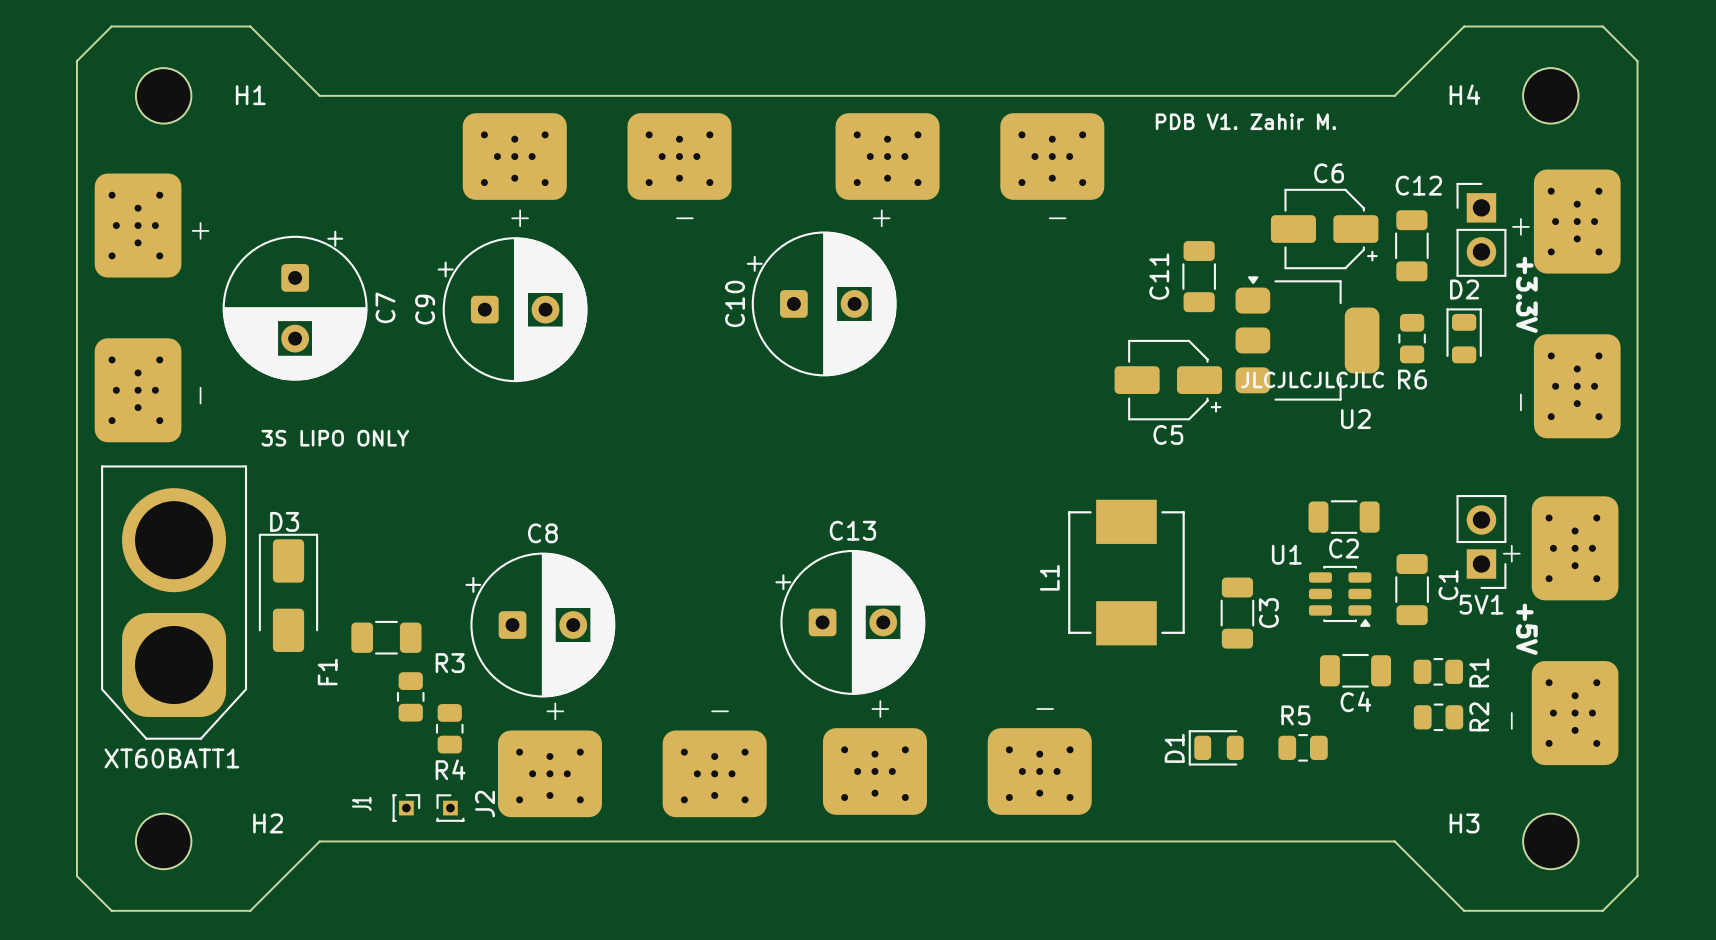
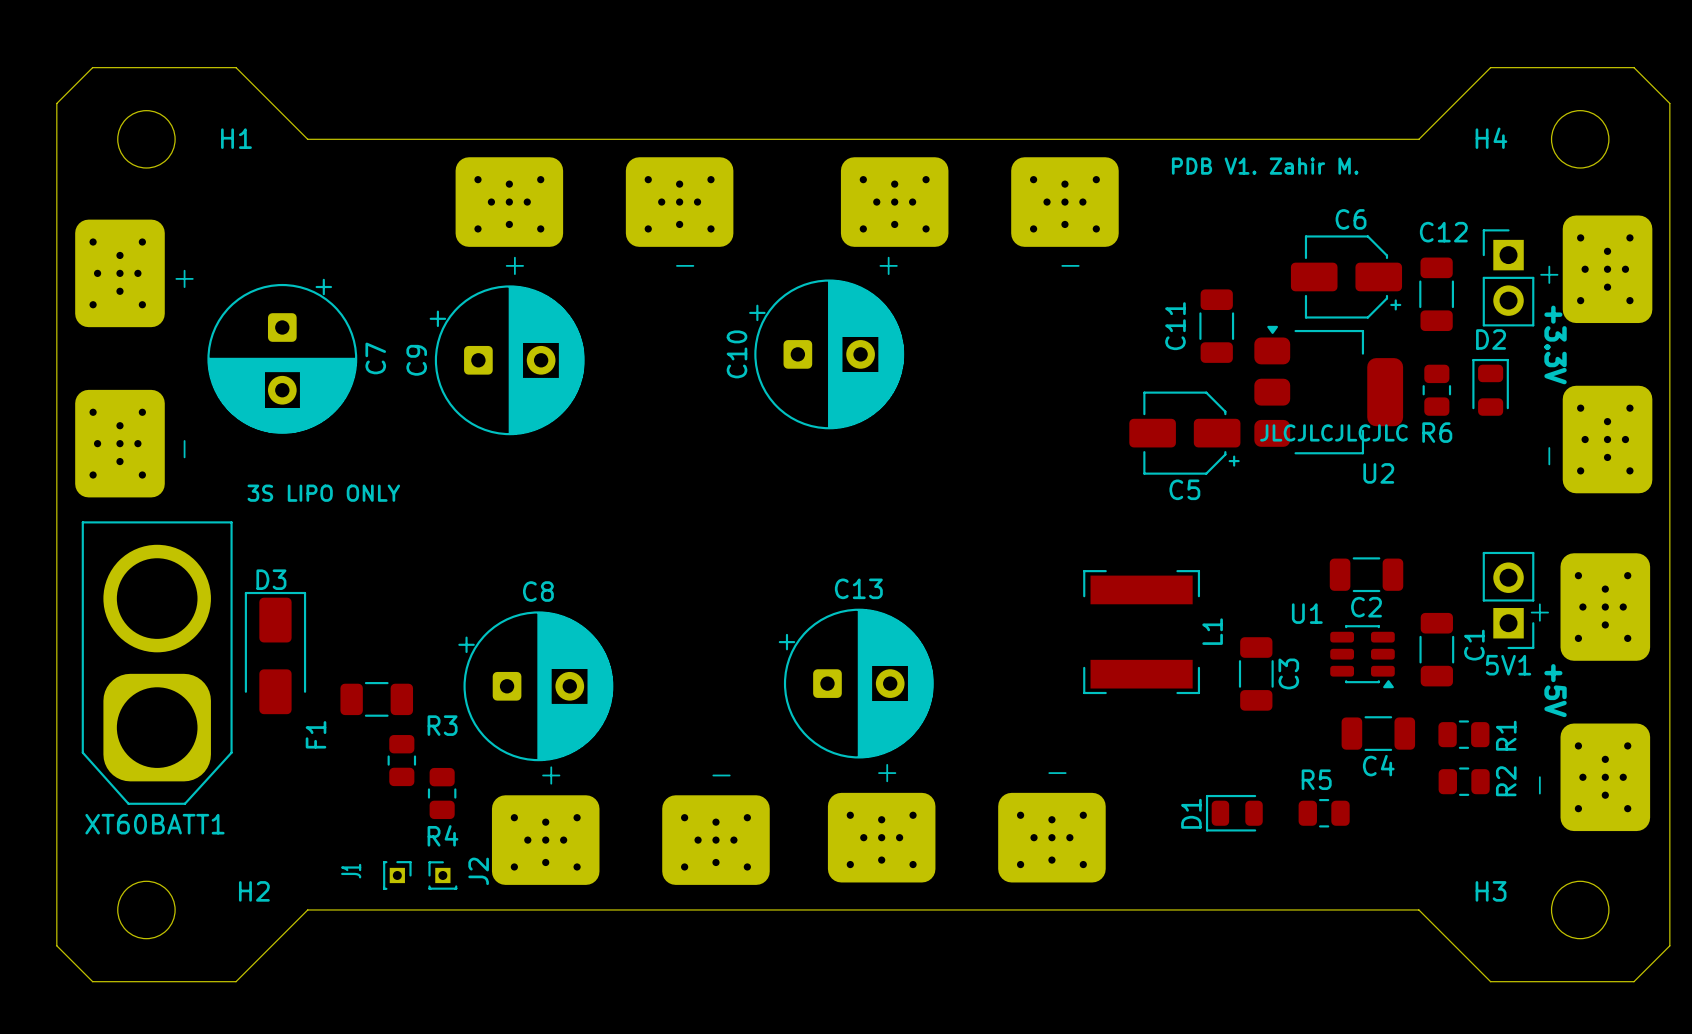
L1 footprint: [1068, 499, 1185, 646] -> [1083, 570, 1201, 695]
L1 name position: L1 (1049, 577) -> L1 (1212, 631)

